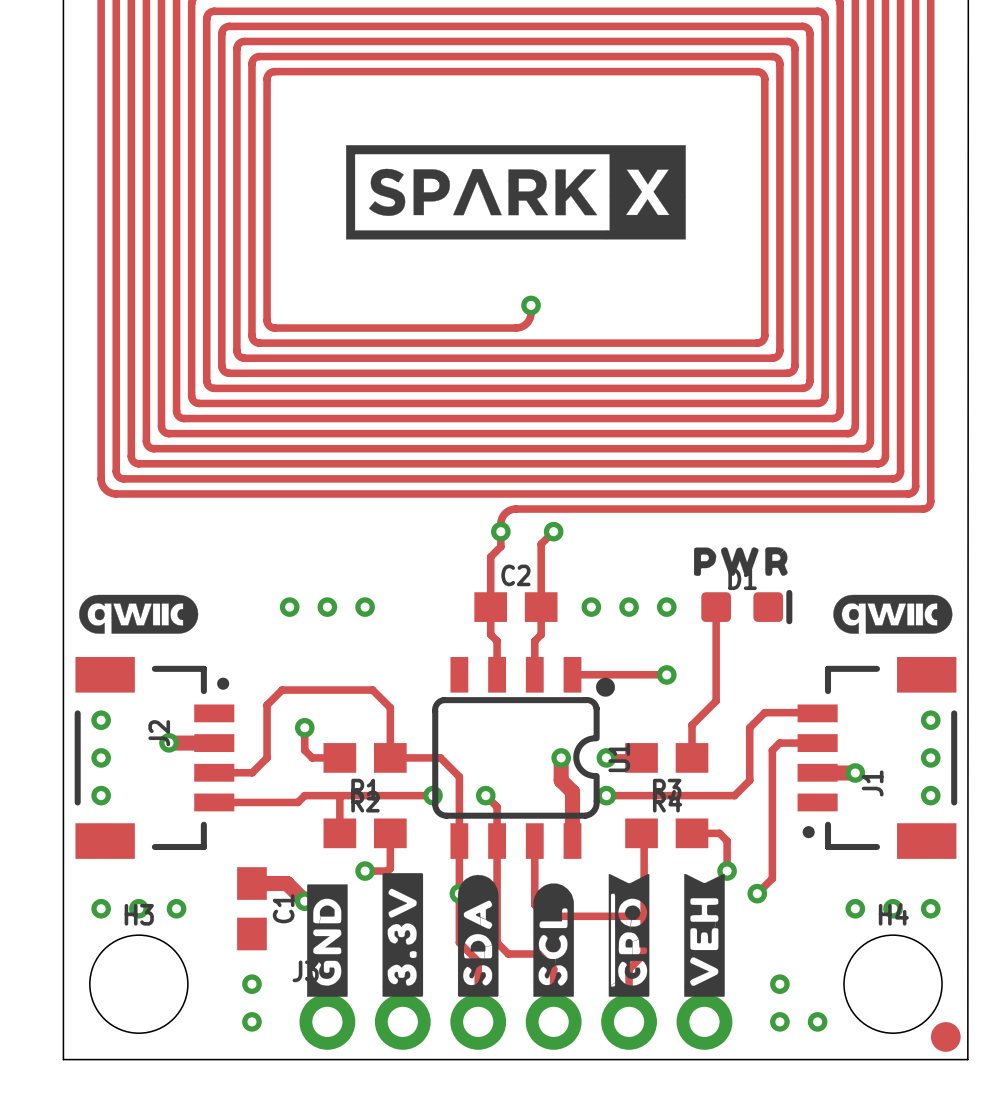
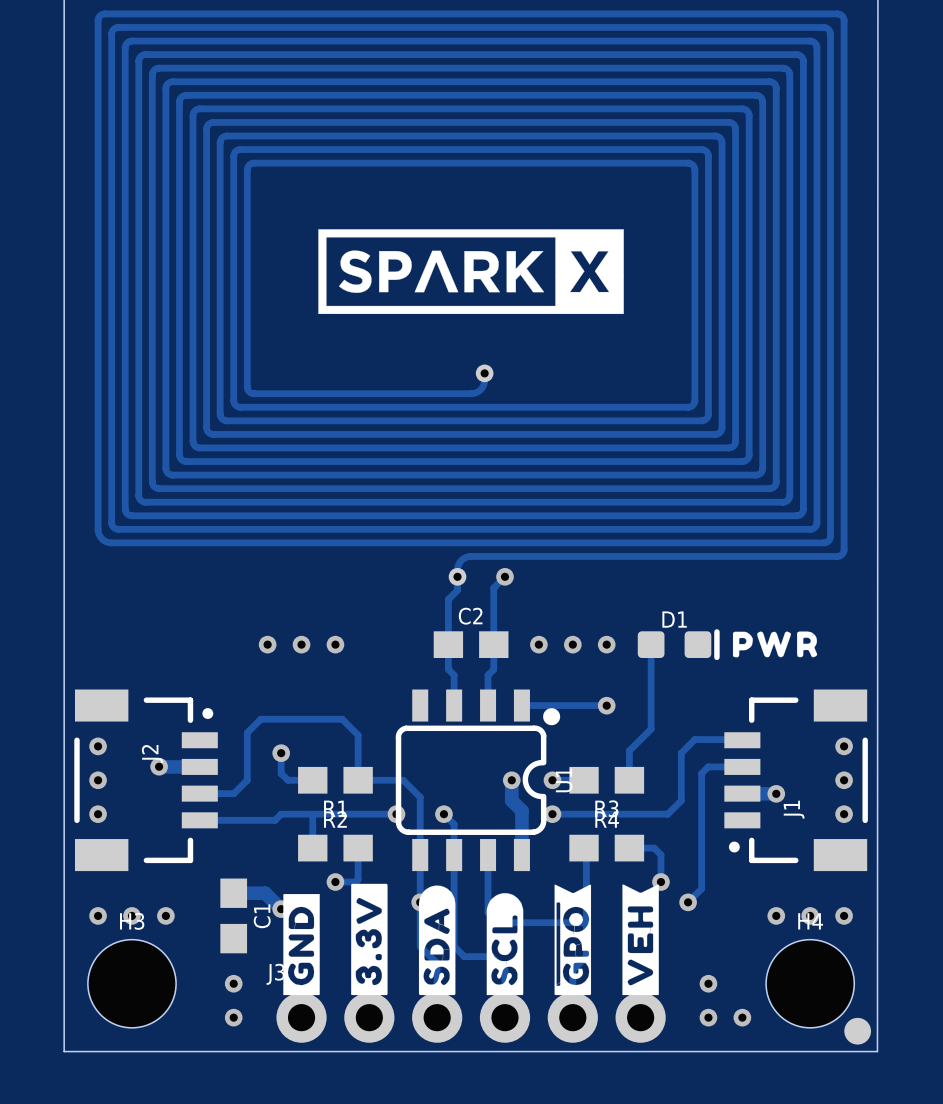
drawing position: (740, 561) -> (775, 644)
drawing: [79, 594, 199, 634] -> none
drawing: [833, 594, 953, 634] -> none

